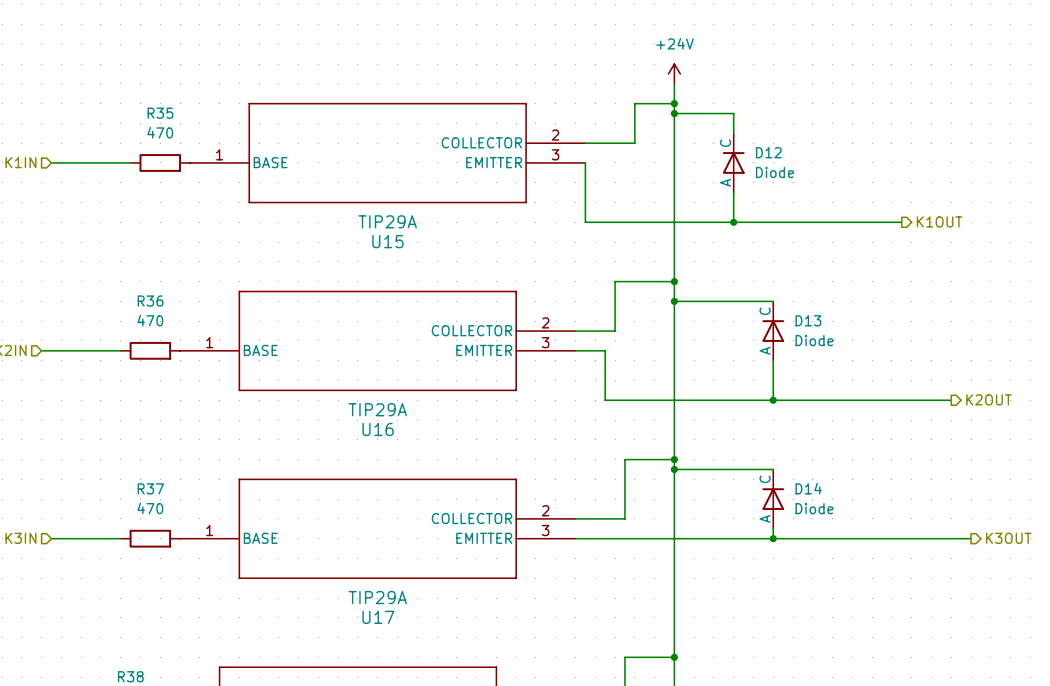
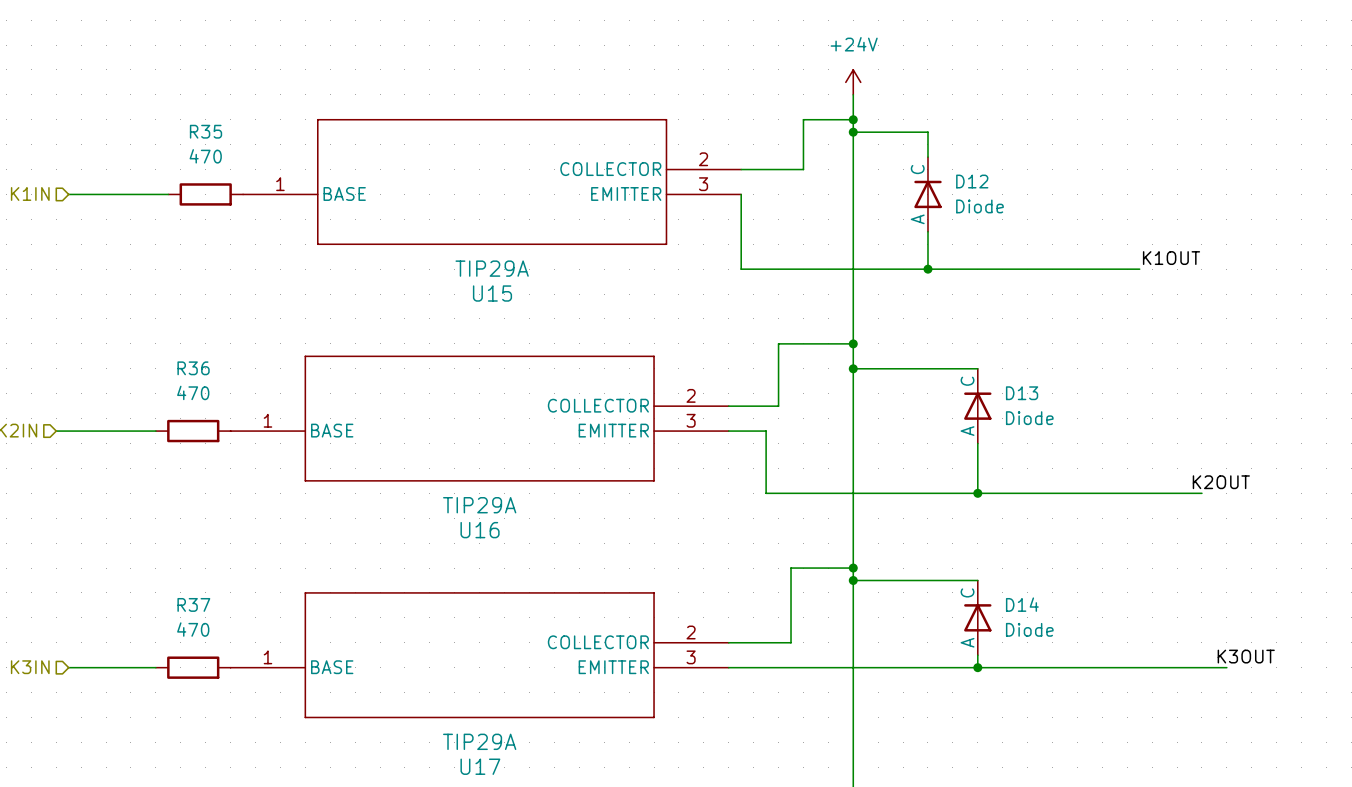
label: none -> K1OUT (1171, 258)
hierarchical label: K1OUT (939, 221) -> none
label: none -> K2OUT (1221, 482)
hierarchical label: K2OUT (989, 399) -> none
label: none -> K3OUT (1246, 656)
hierarchical label: K3OUT (1008, 538) -> none

